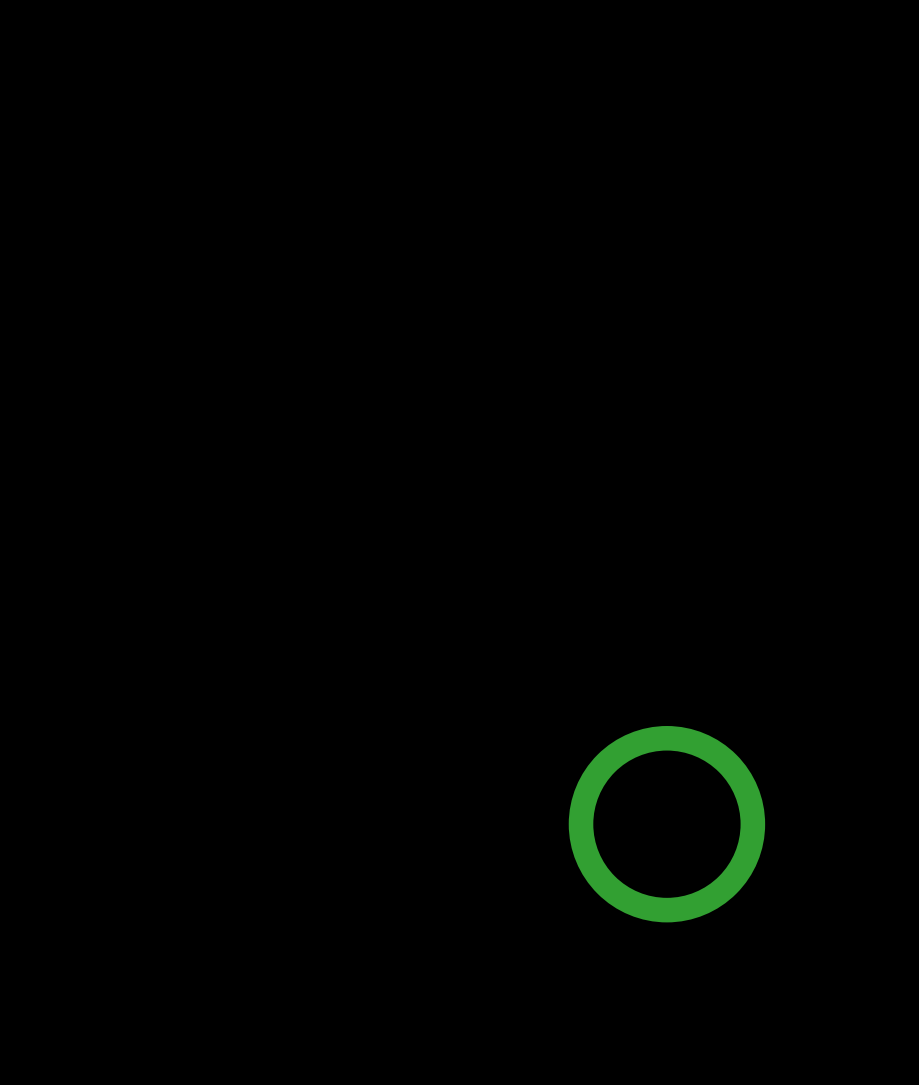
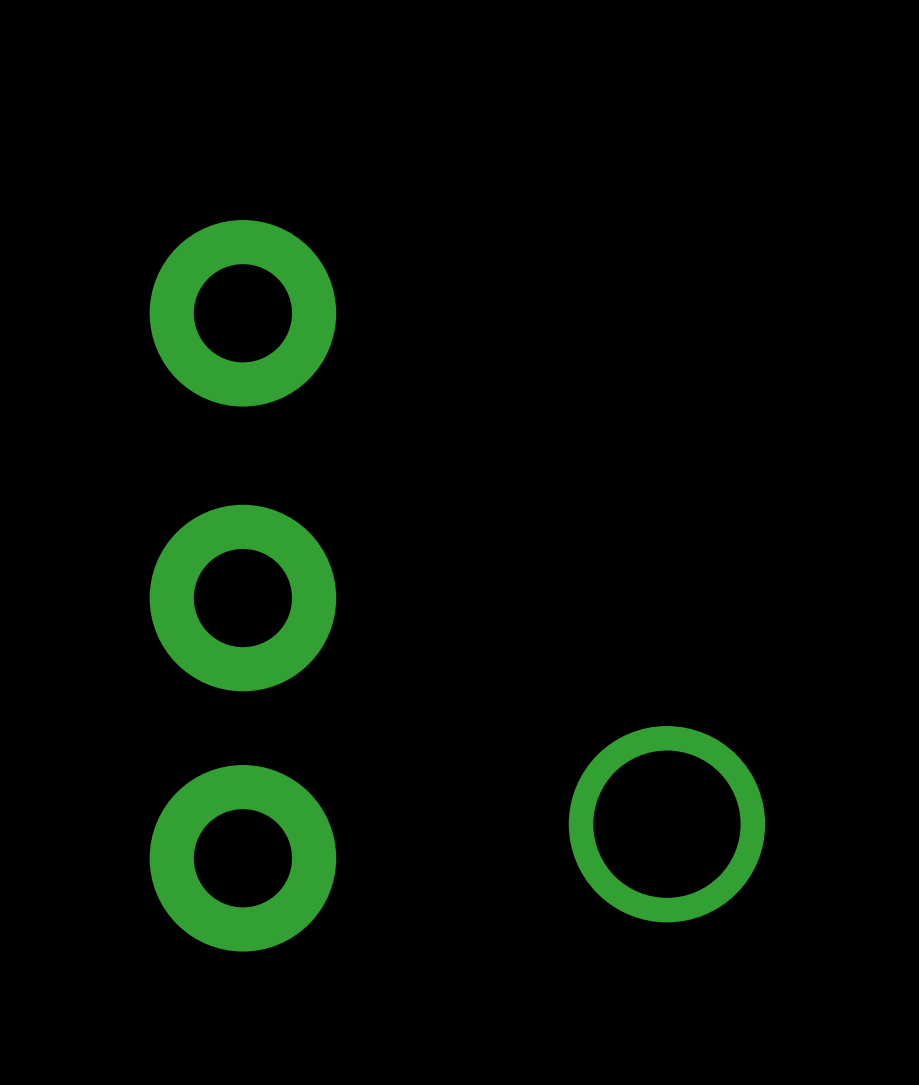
part: none -> (242, 585)

